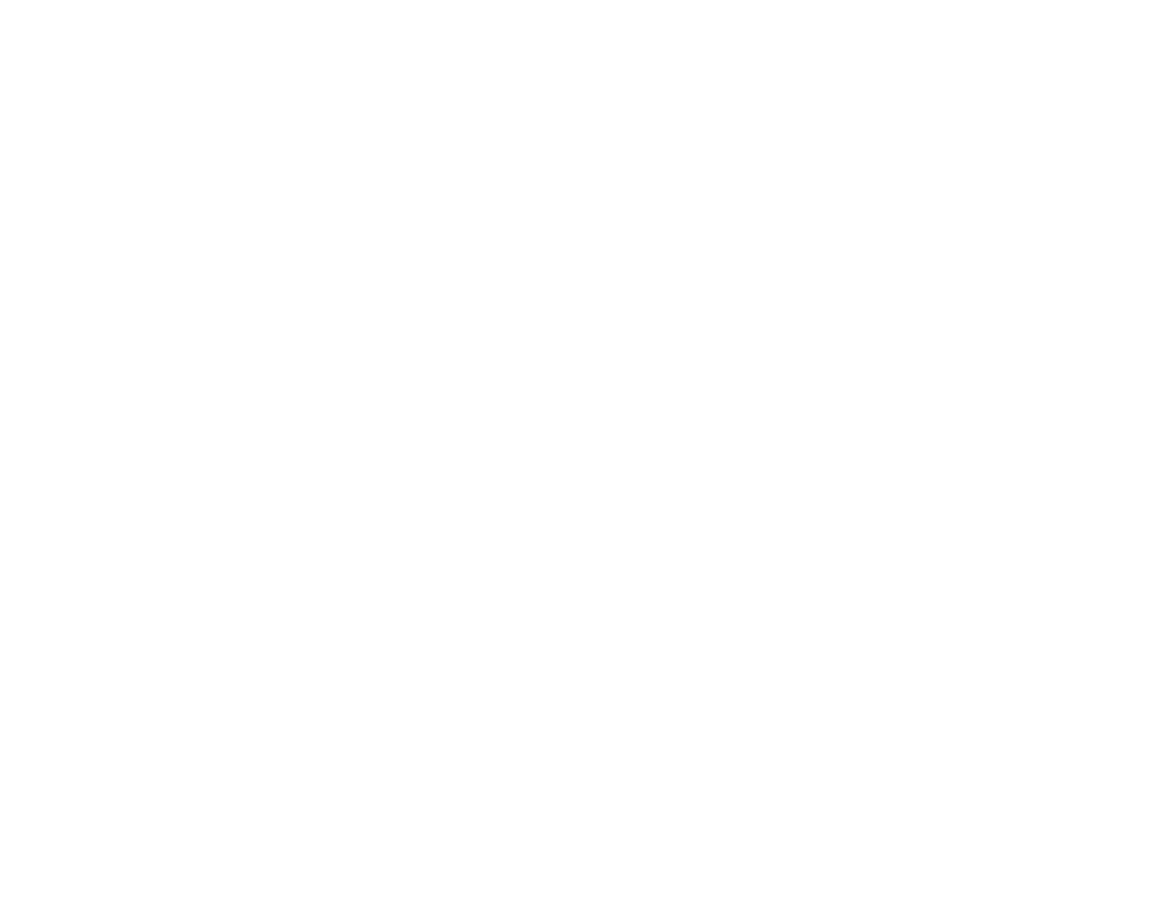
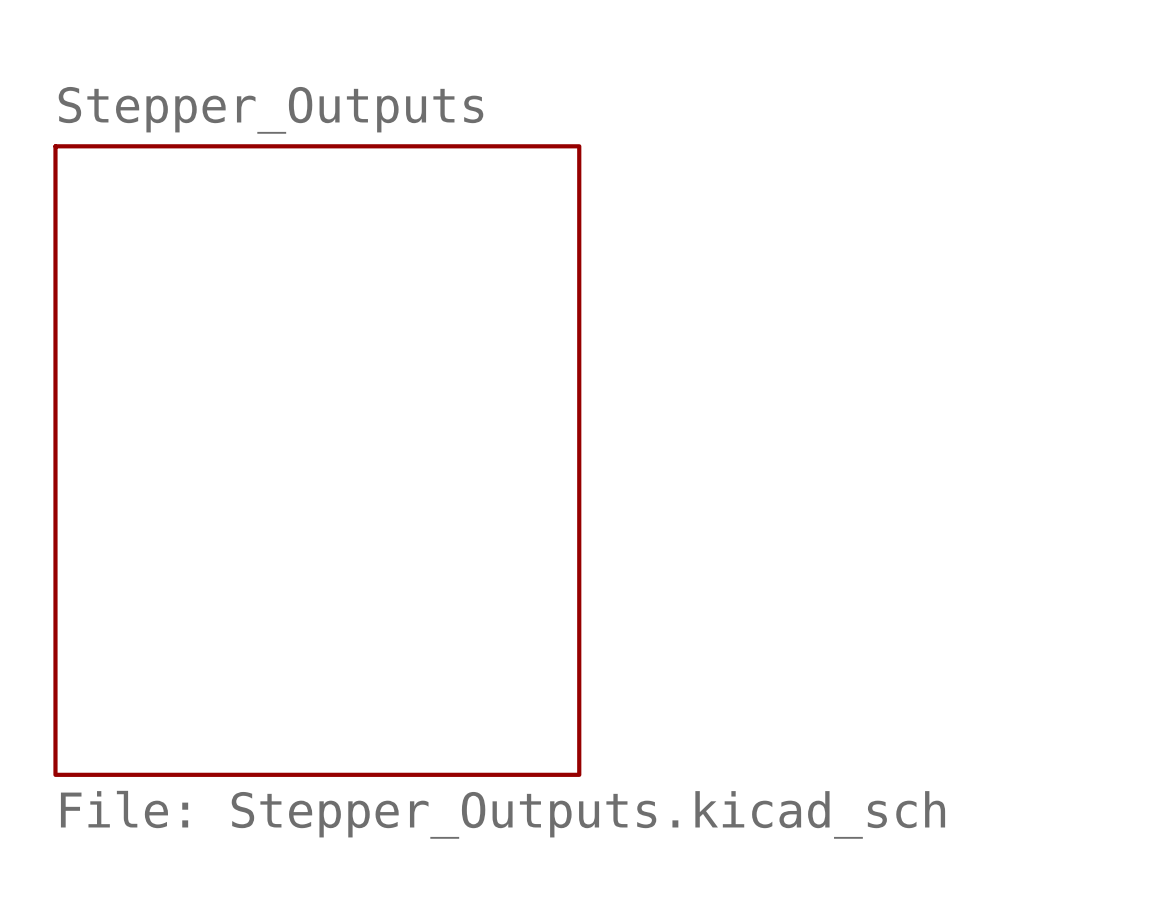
sheet Stepper_Outputs: none -> File: Stepper_Outputs.kicad_sch (317, 460)

